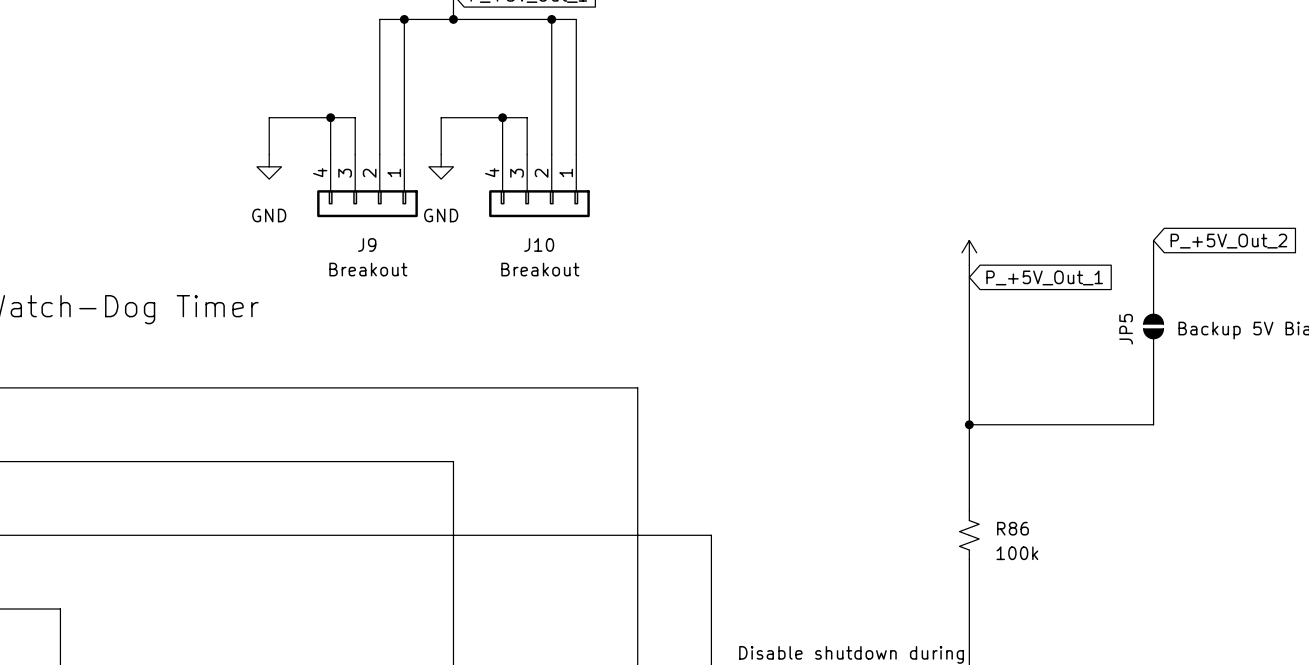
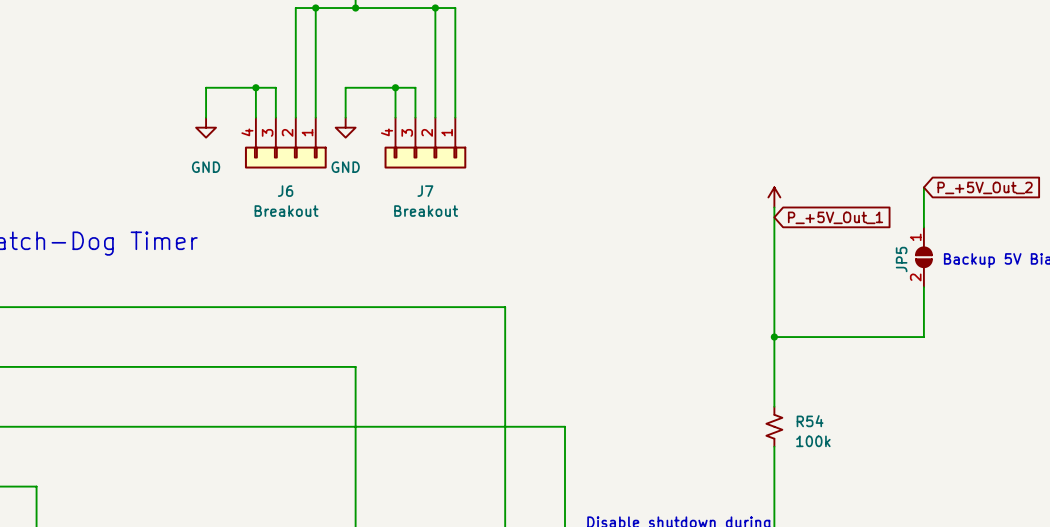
J9 name: J9 (367, 244) -> J6 (285, 191)
J10 name: J10 (539, 244) -> J7 (425, 191)
JP5 pin number: none -> 1 (915, 237)
JP5 pin number: none -> 2 (915, 277)
R86 name: R86 (1013, 528) -> R54 (810, 421)

